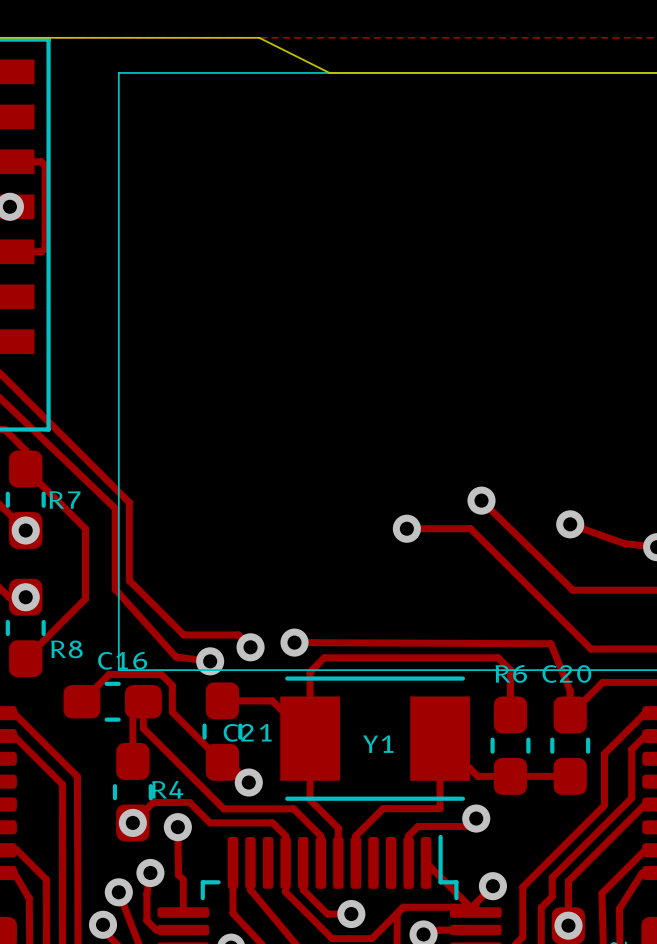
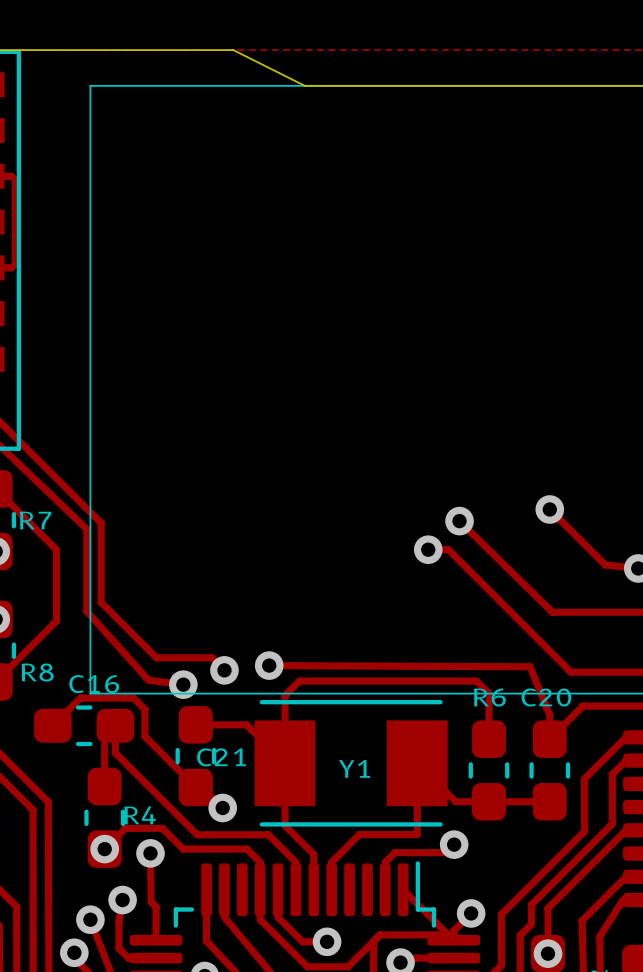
track: (570, 524) (624, 543) -> (549, 509) (605, 564)
via position: (570, 524) -> (549, 509)
track: (406, 528) (450, 528) -> none
via position: (406, 528) -> (428, 549)

